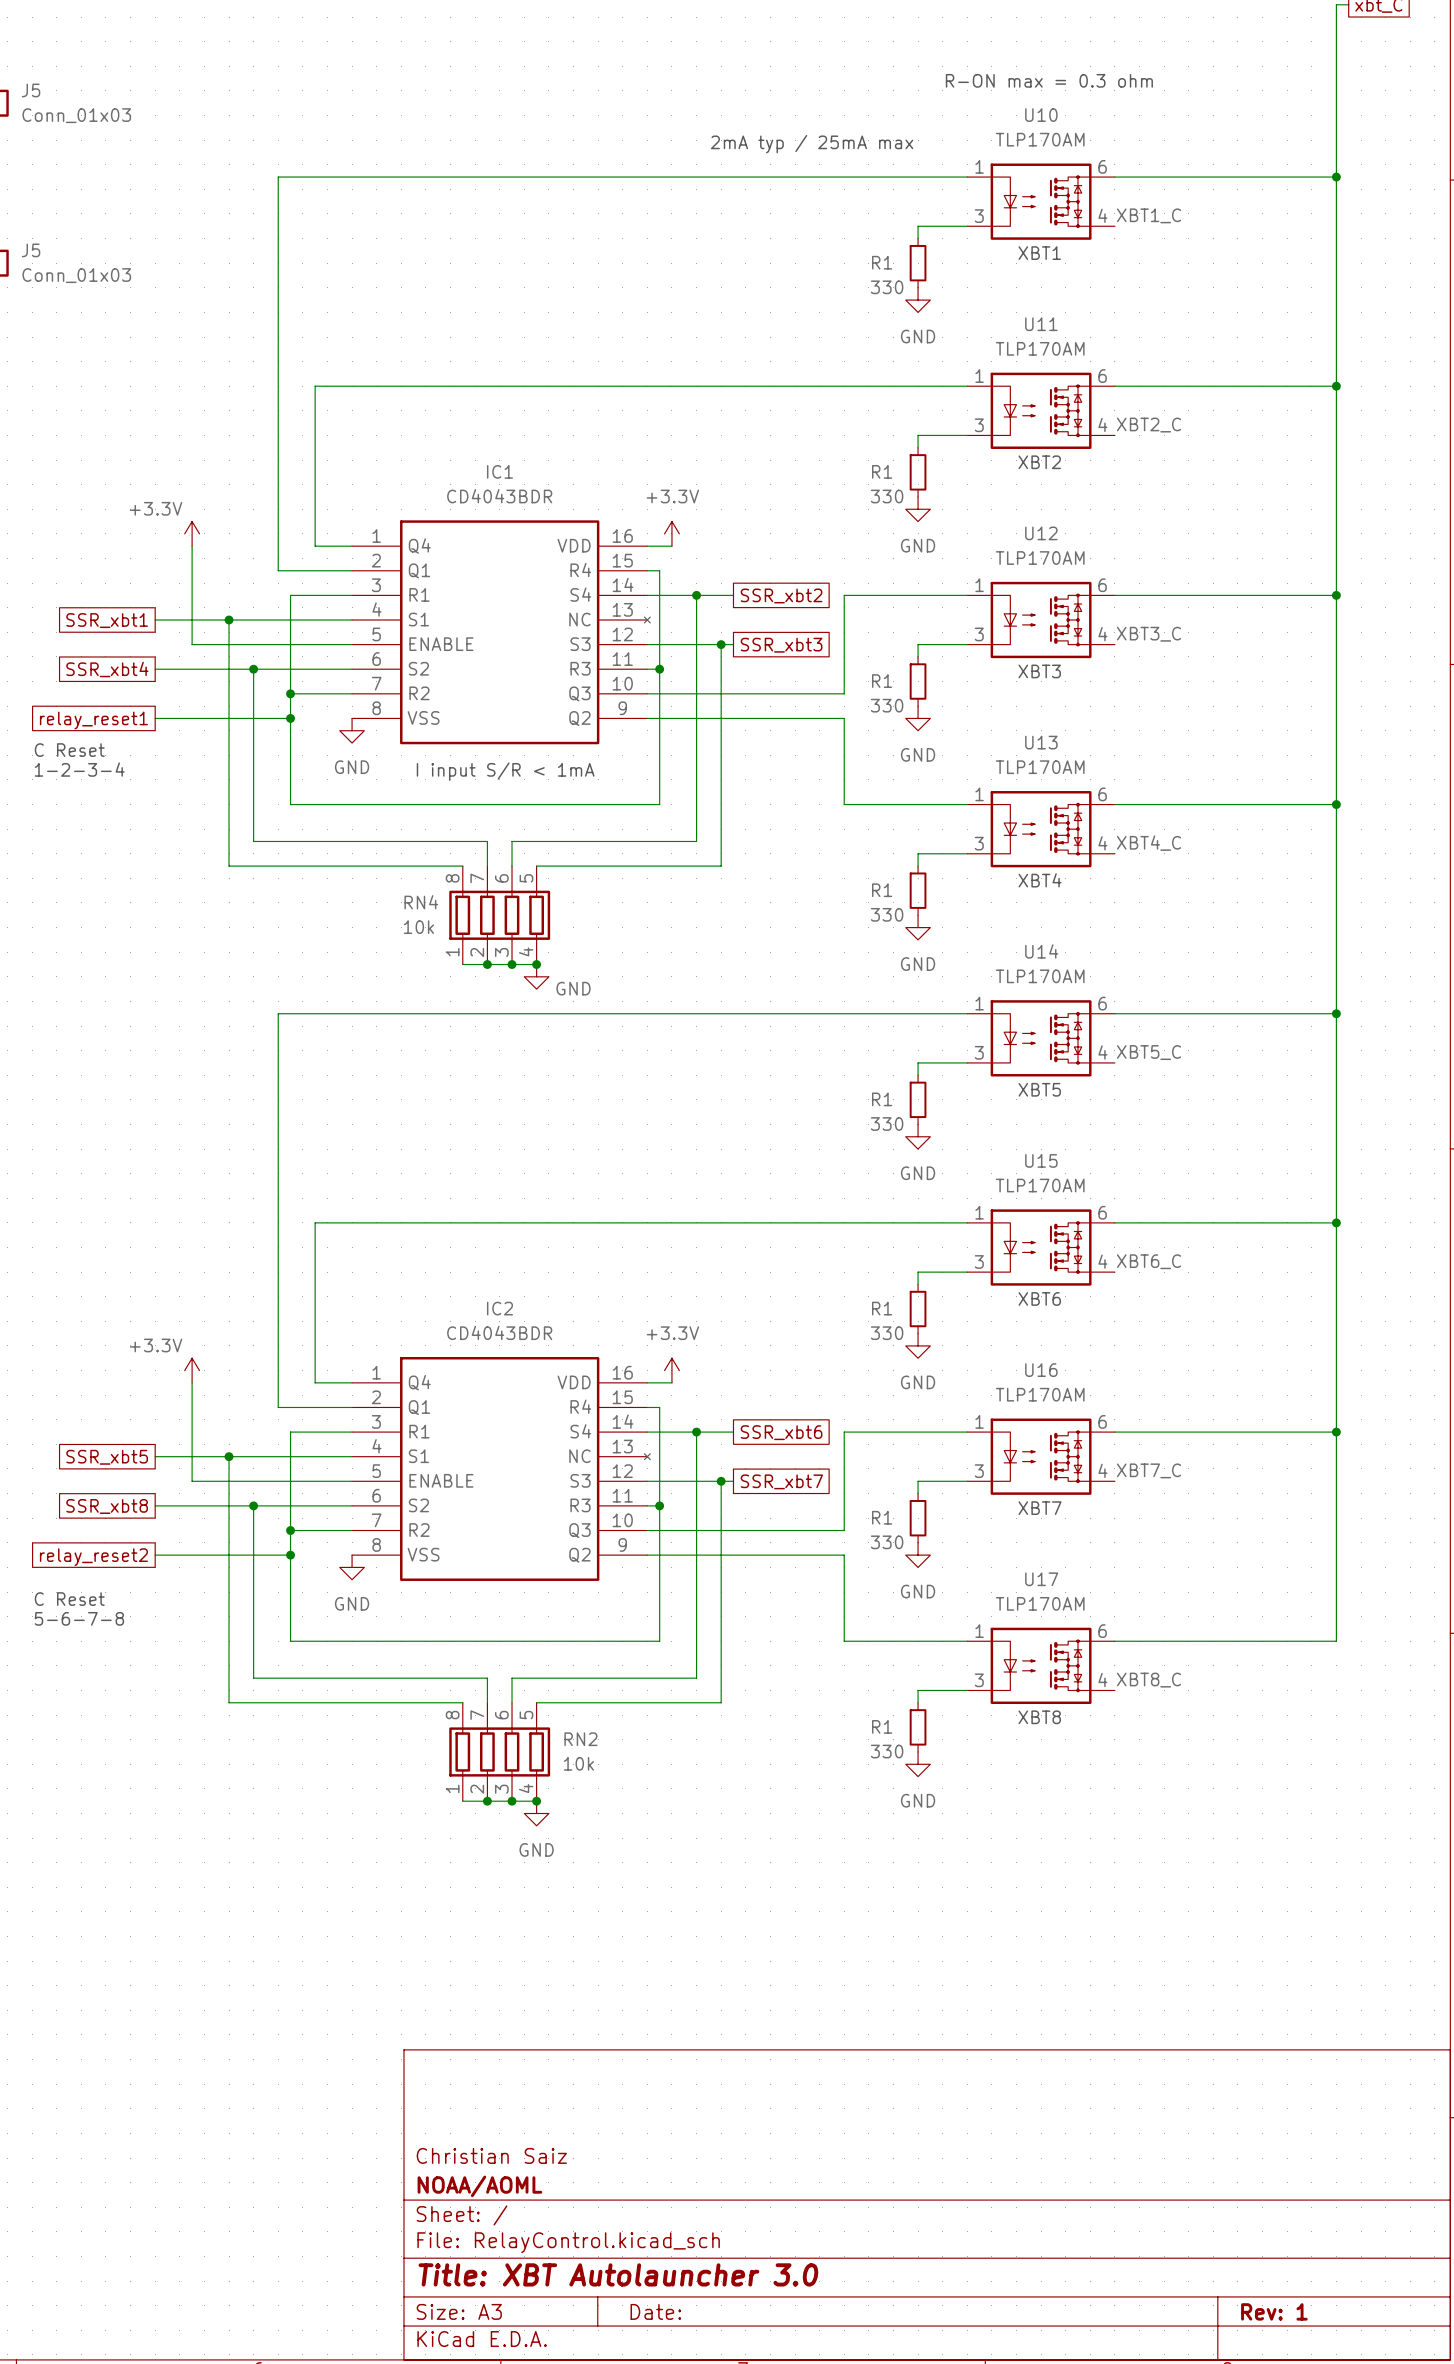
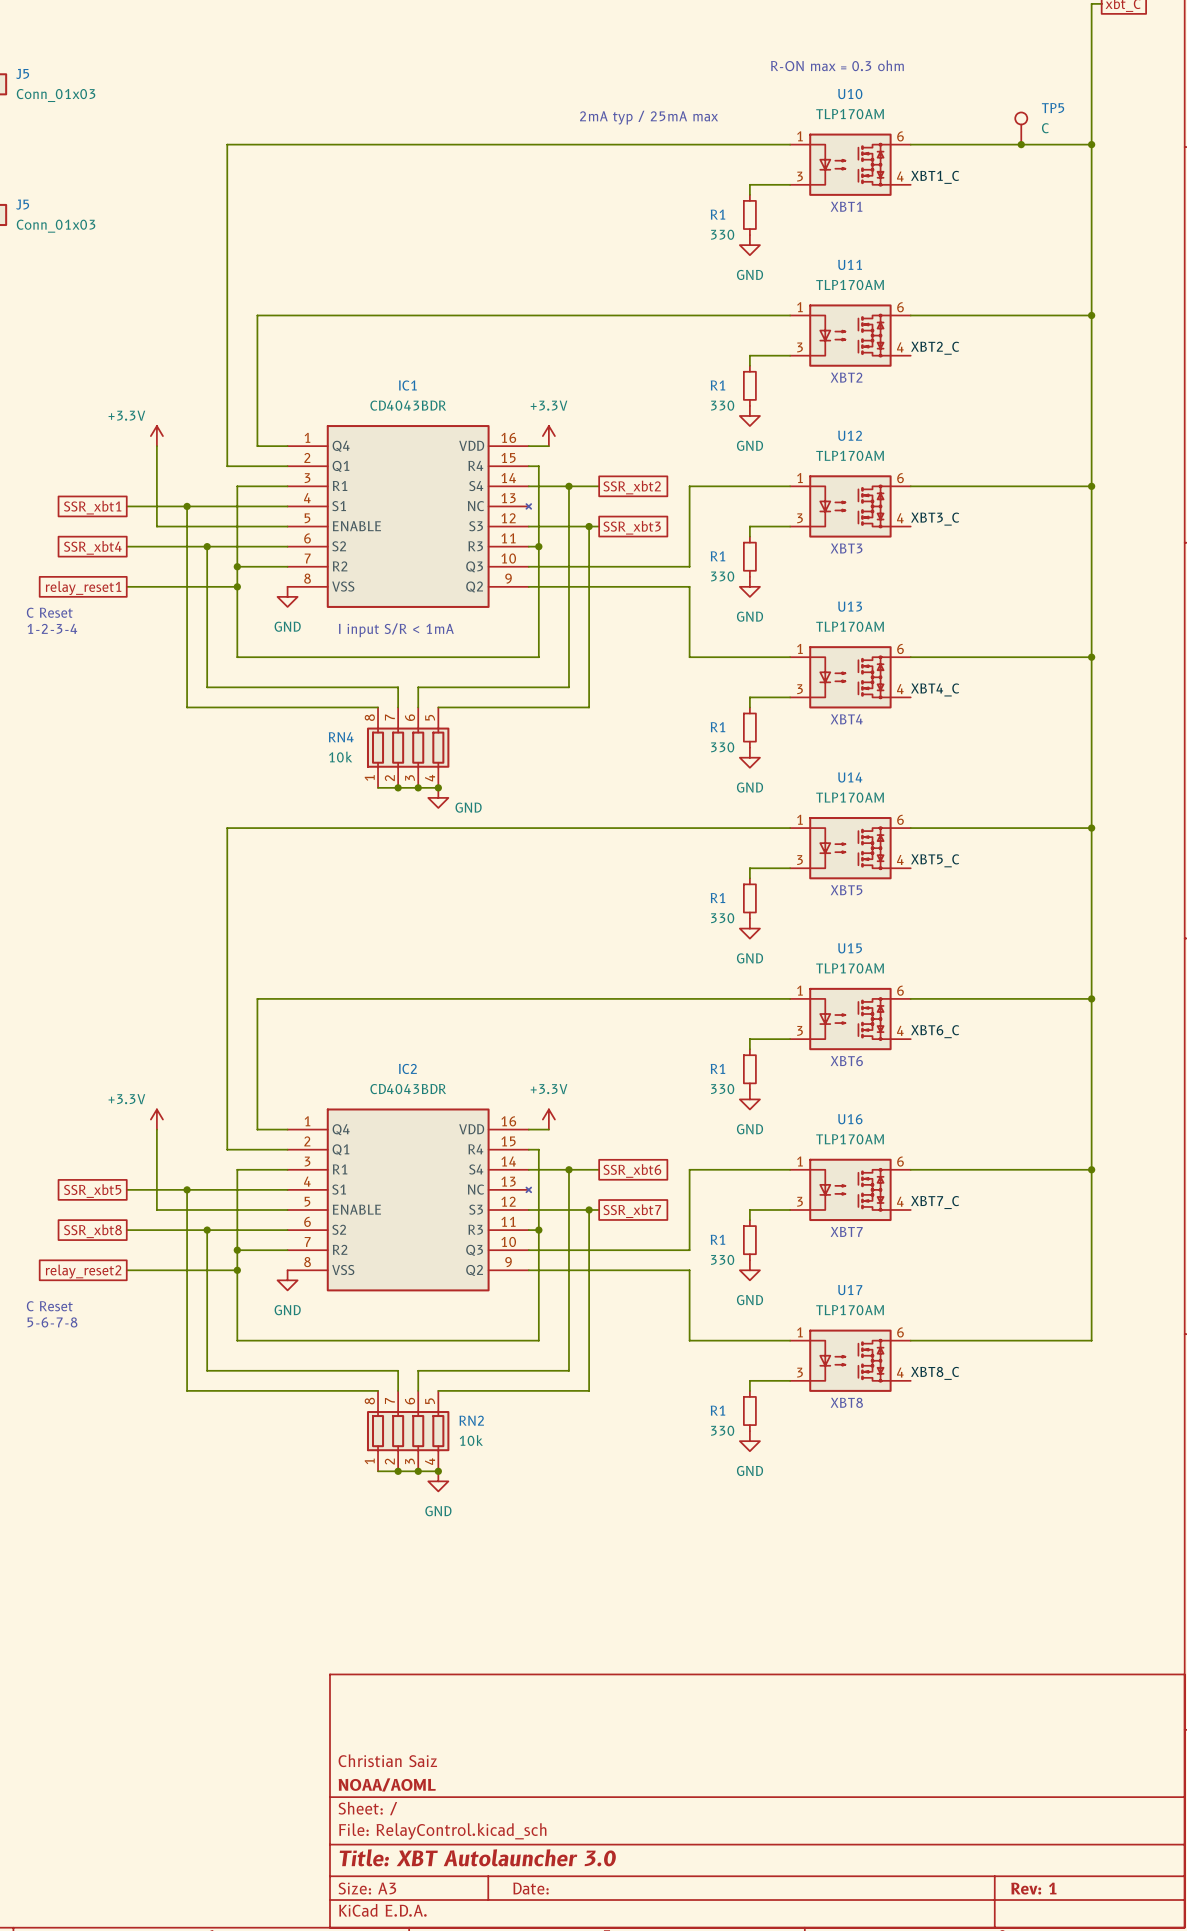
TP5: none -> C (1021, 128)
junction: none -> (1021, 144)

